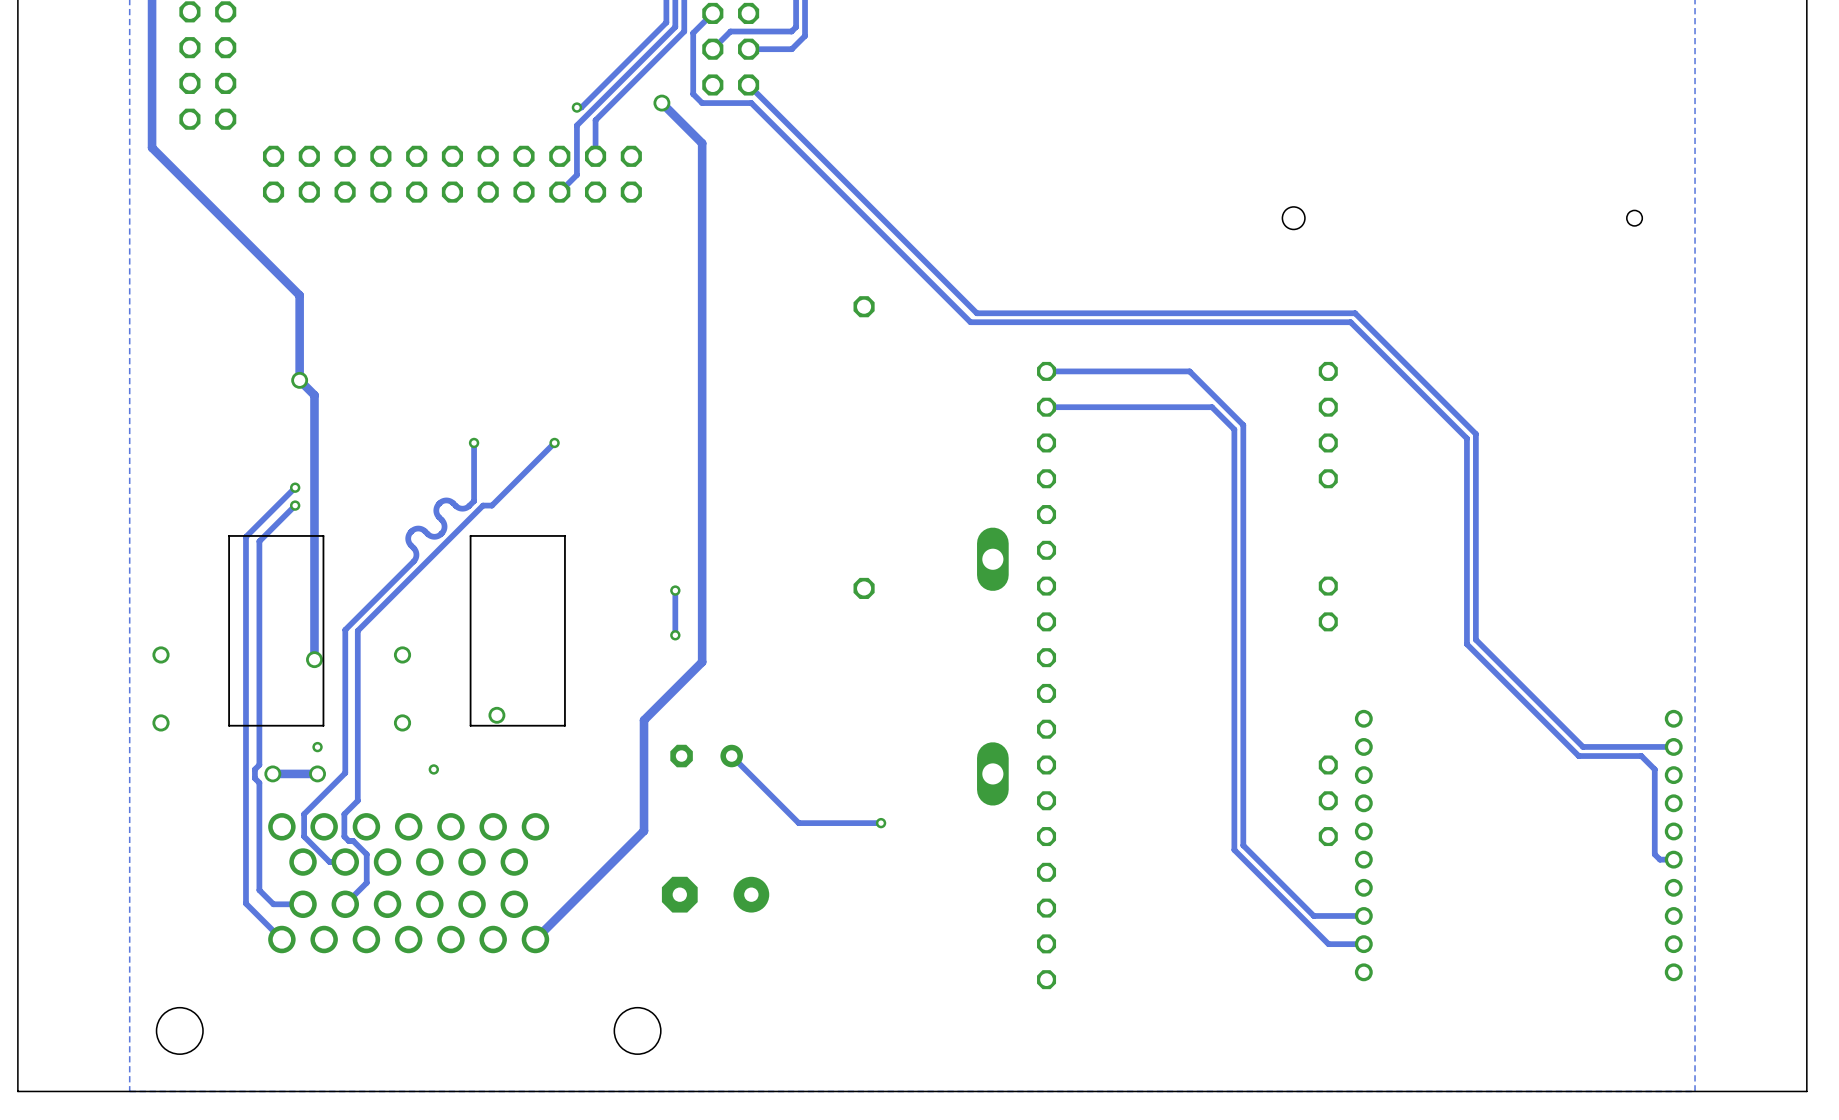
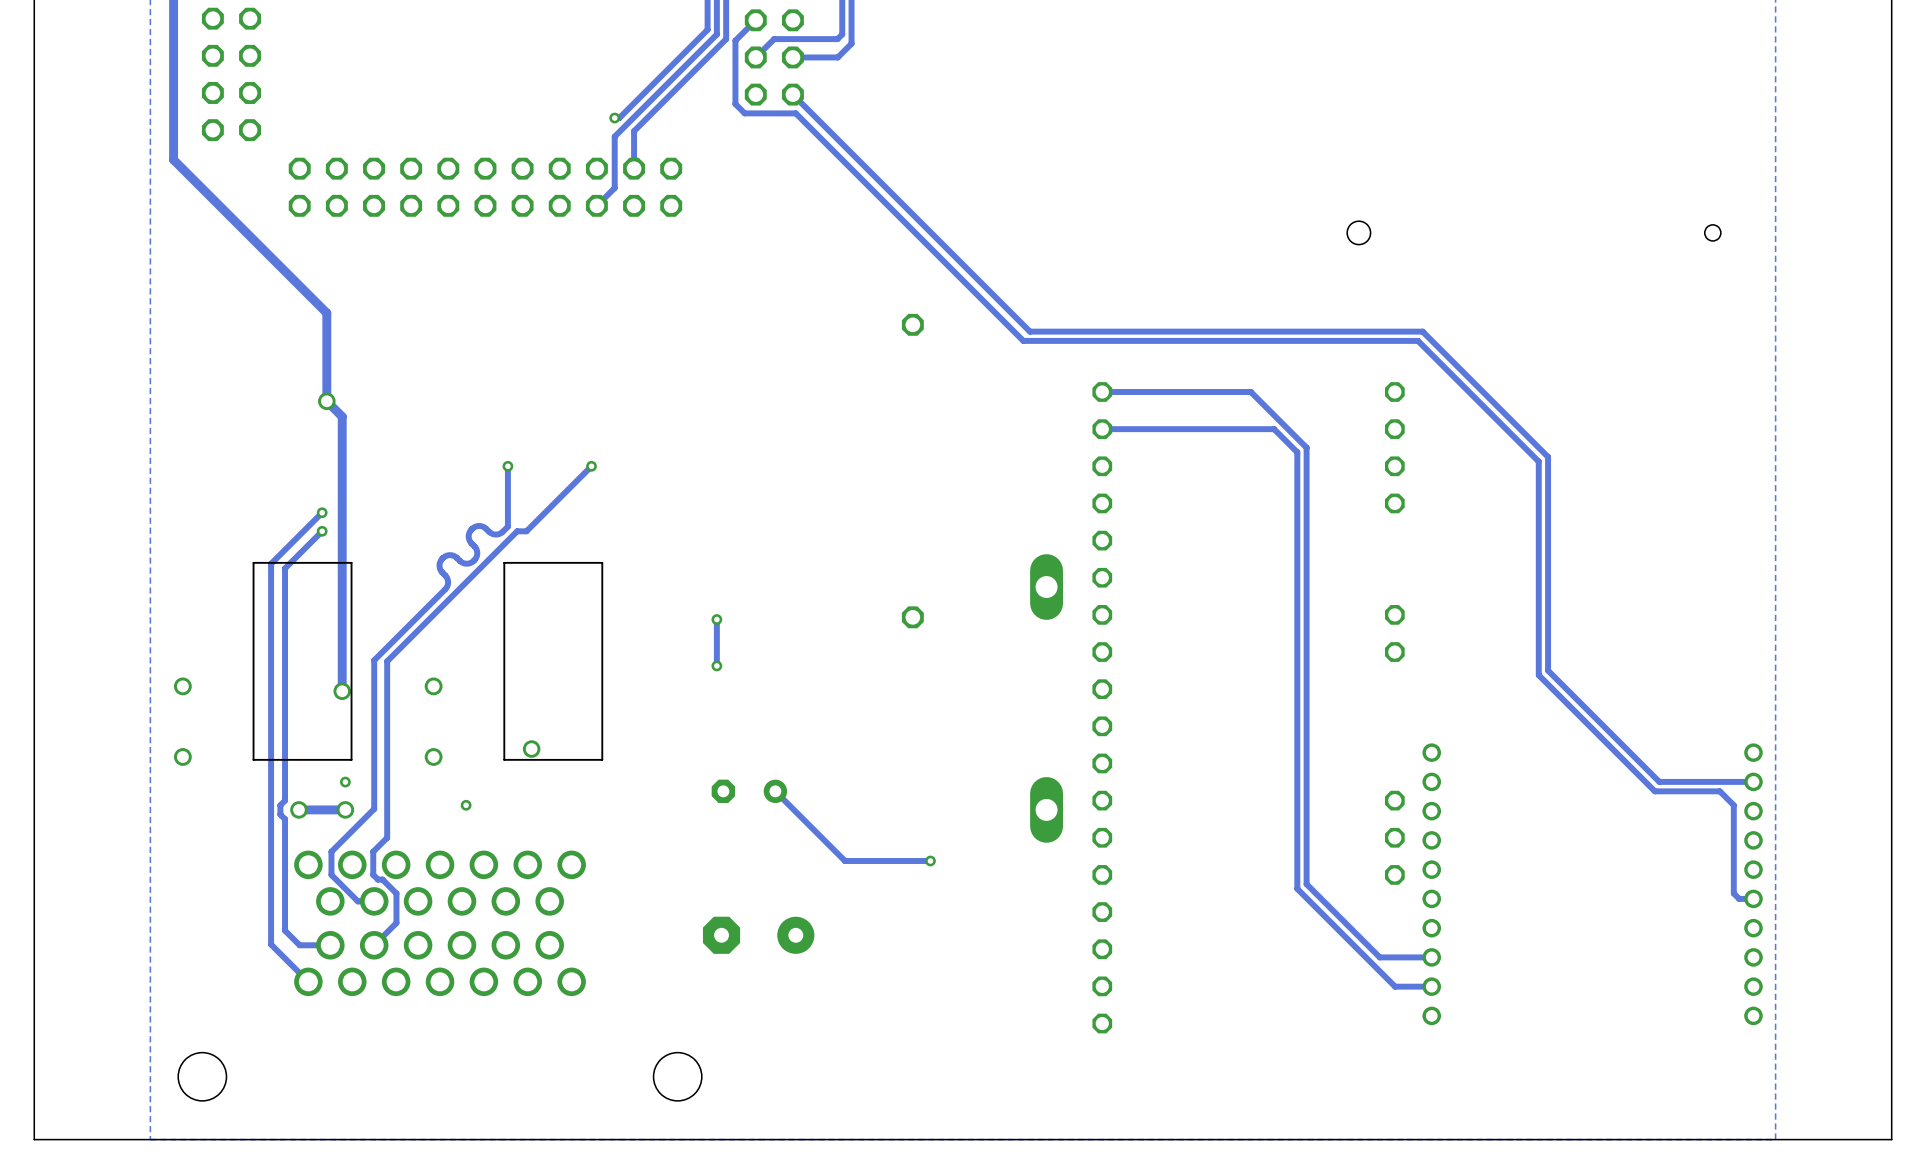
track: (661, 103) (702, 143) (702, 662) (644, 720) (644, 830) (535, 939) -> none
via: (661, 103) -> none

